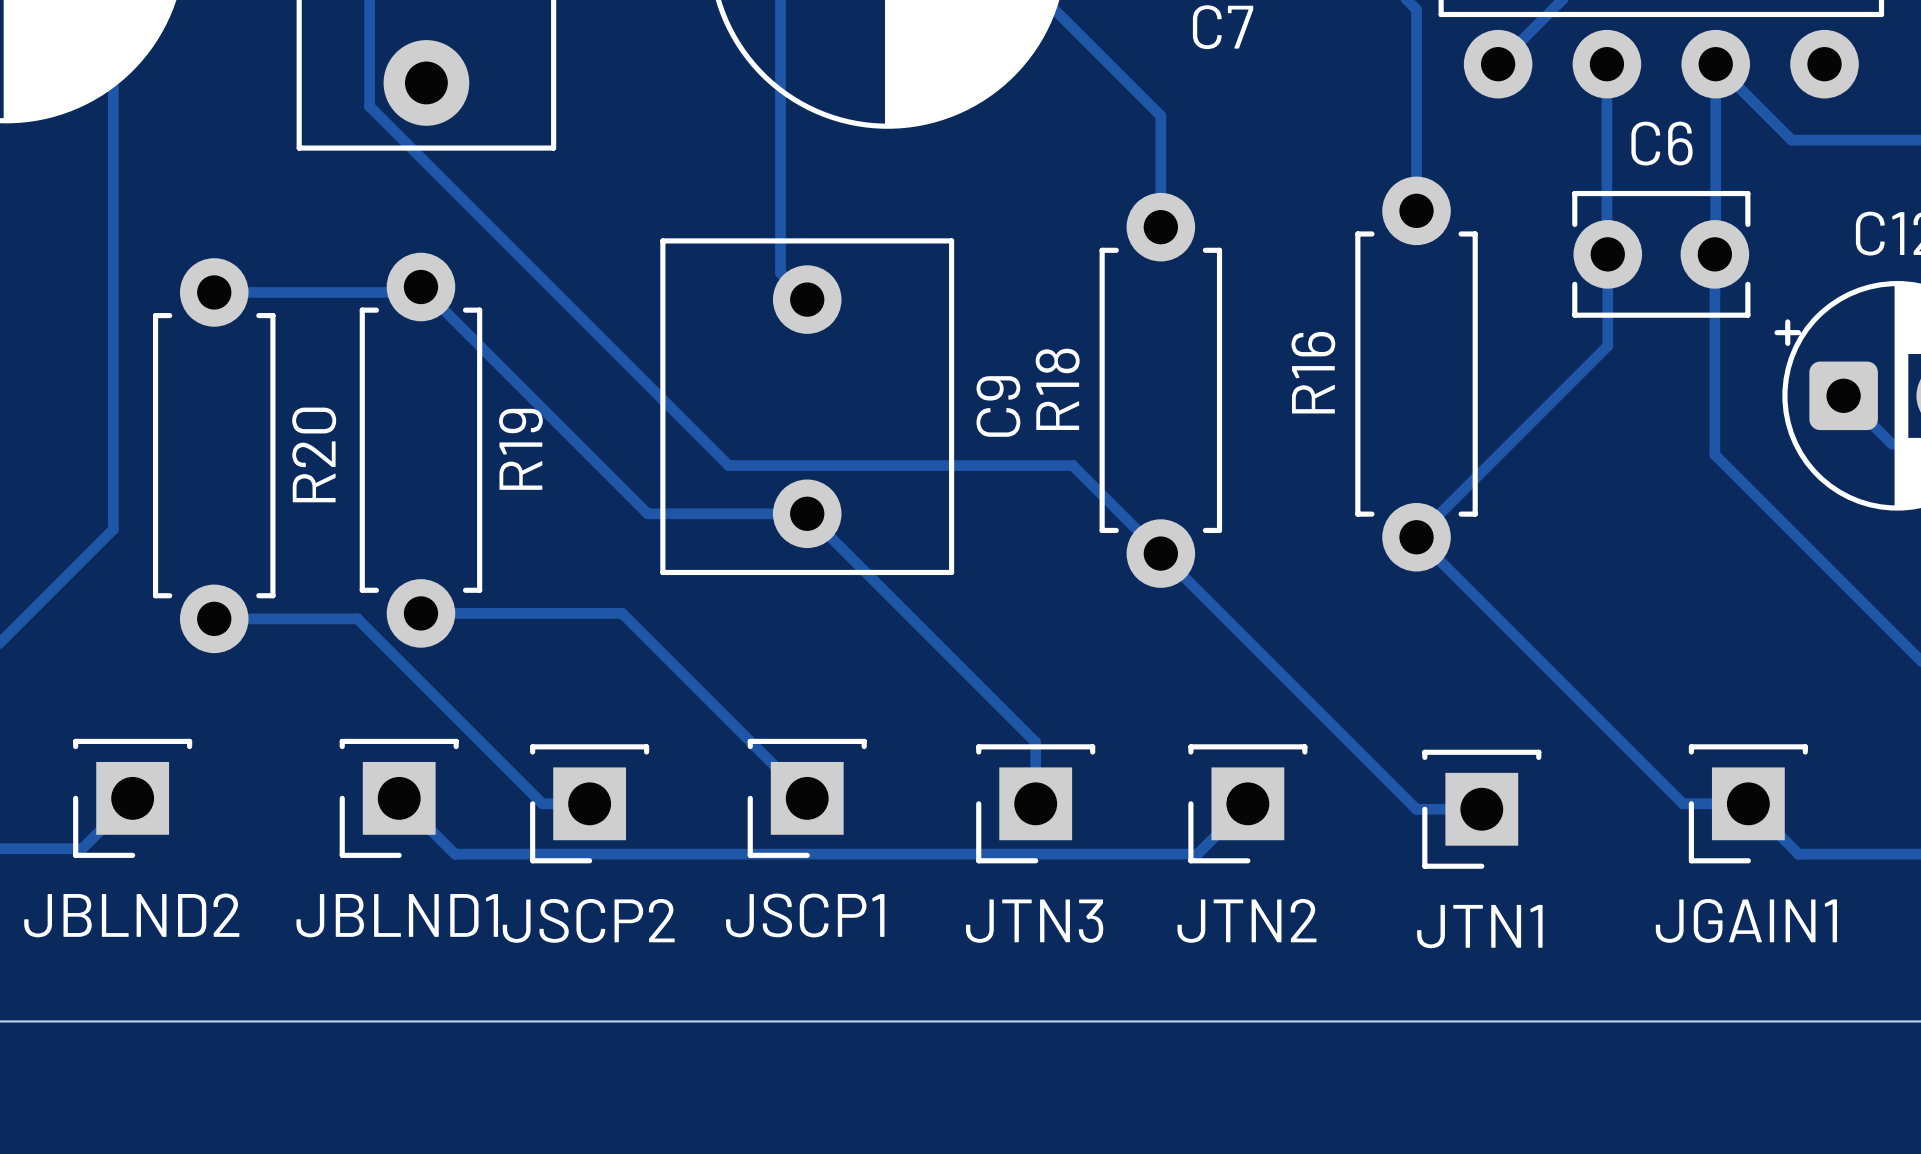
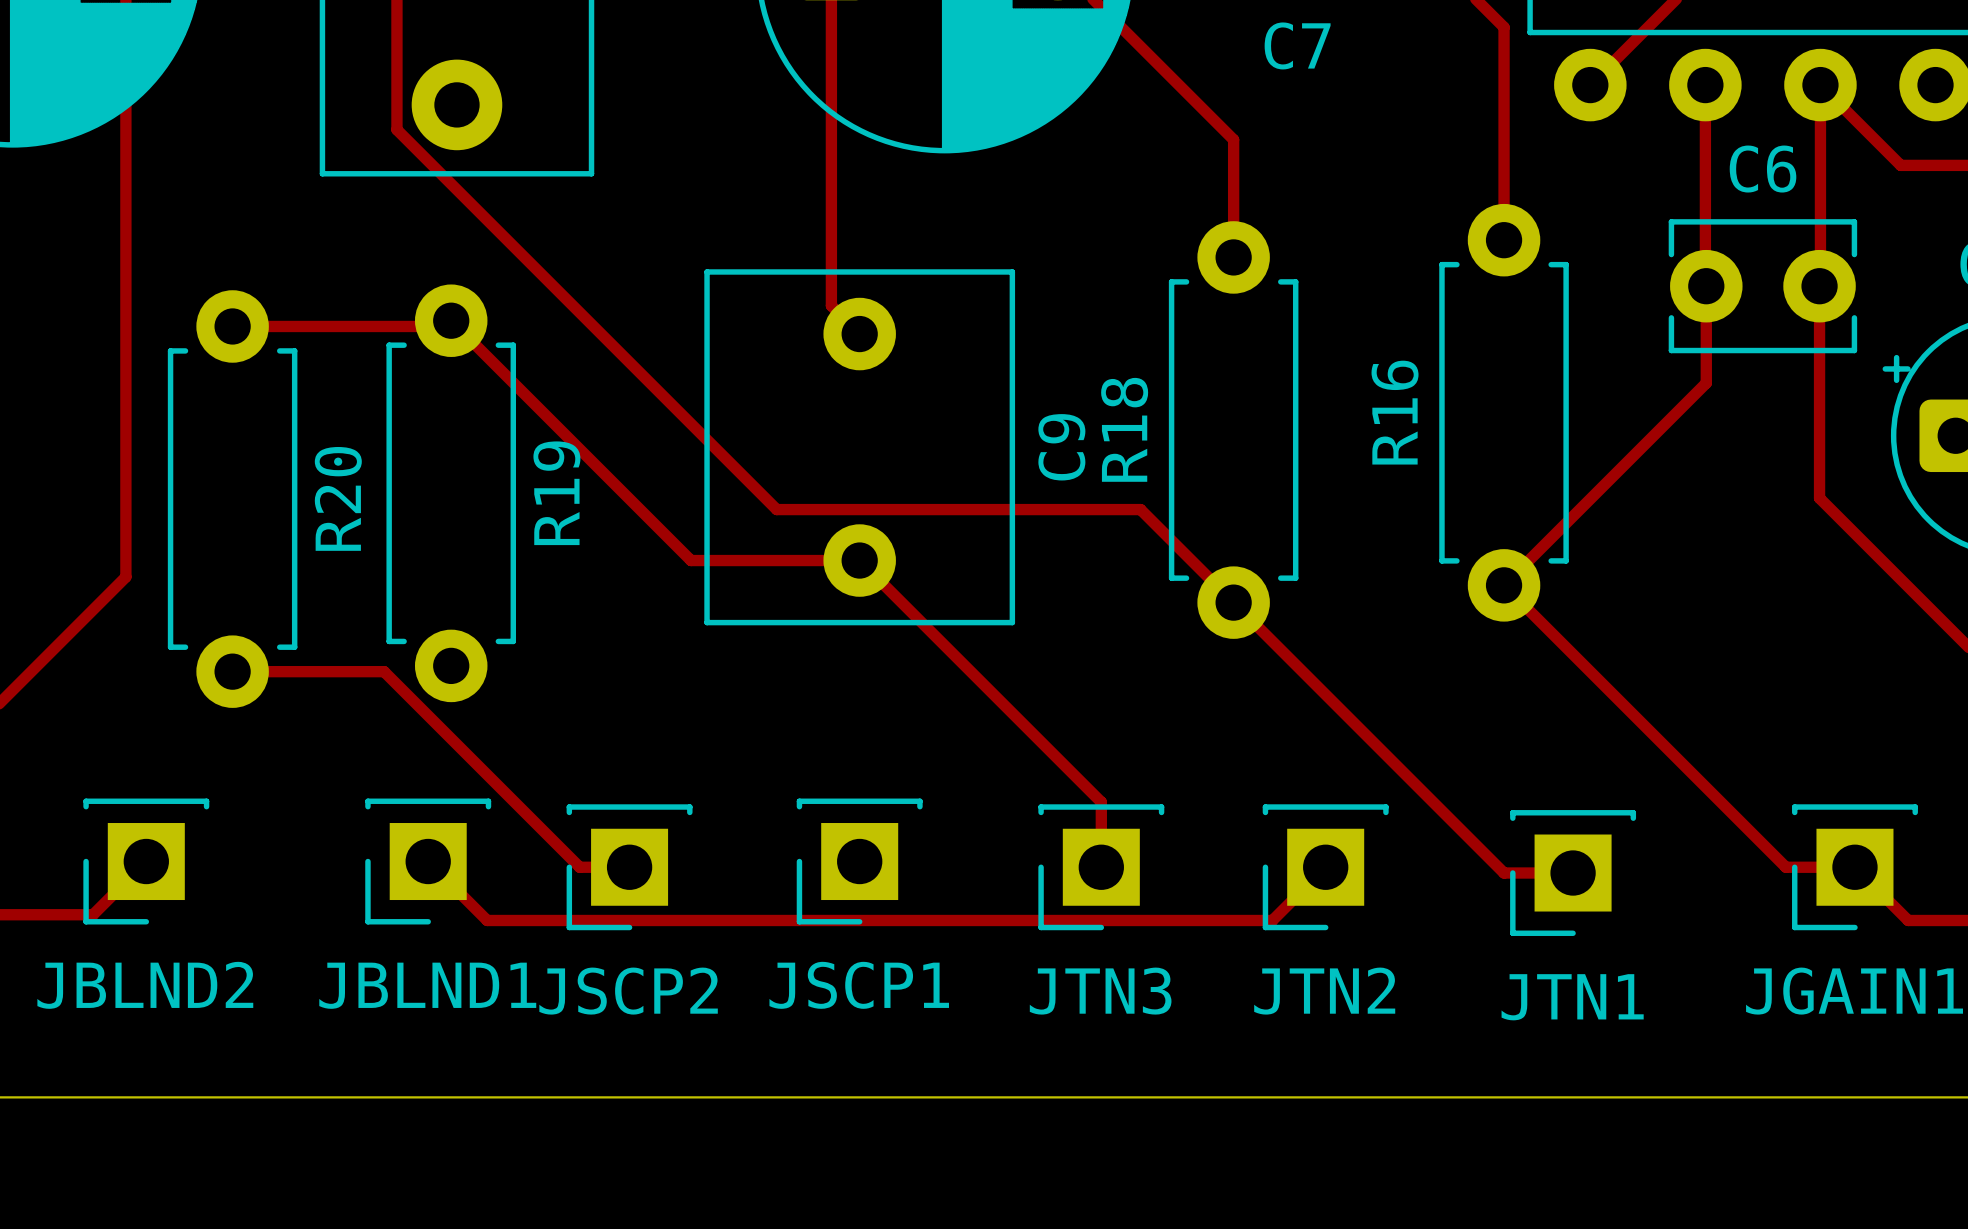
track: (420, 613) (622, 613) (807, 798) -> none

